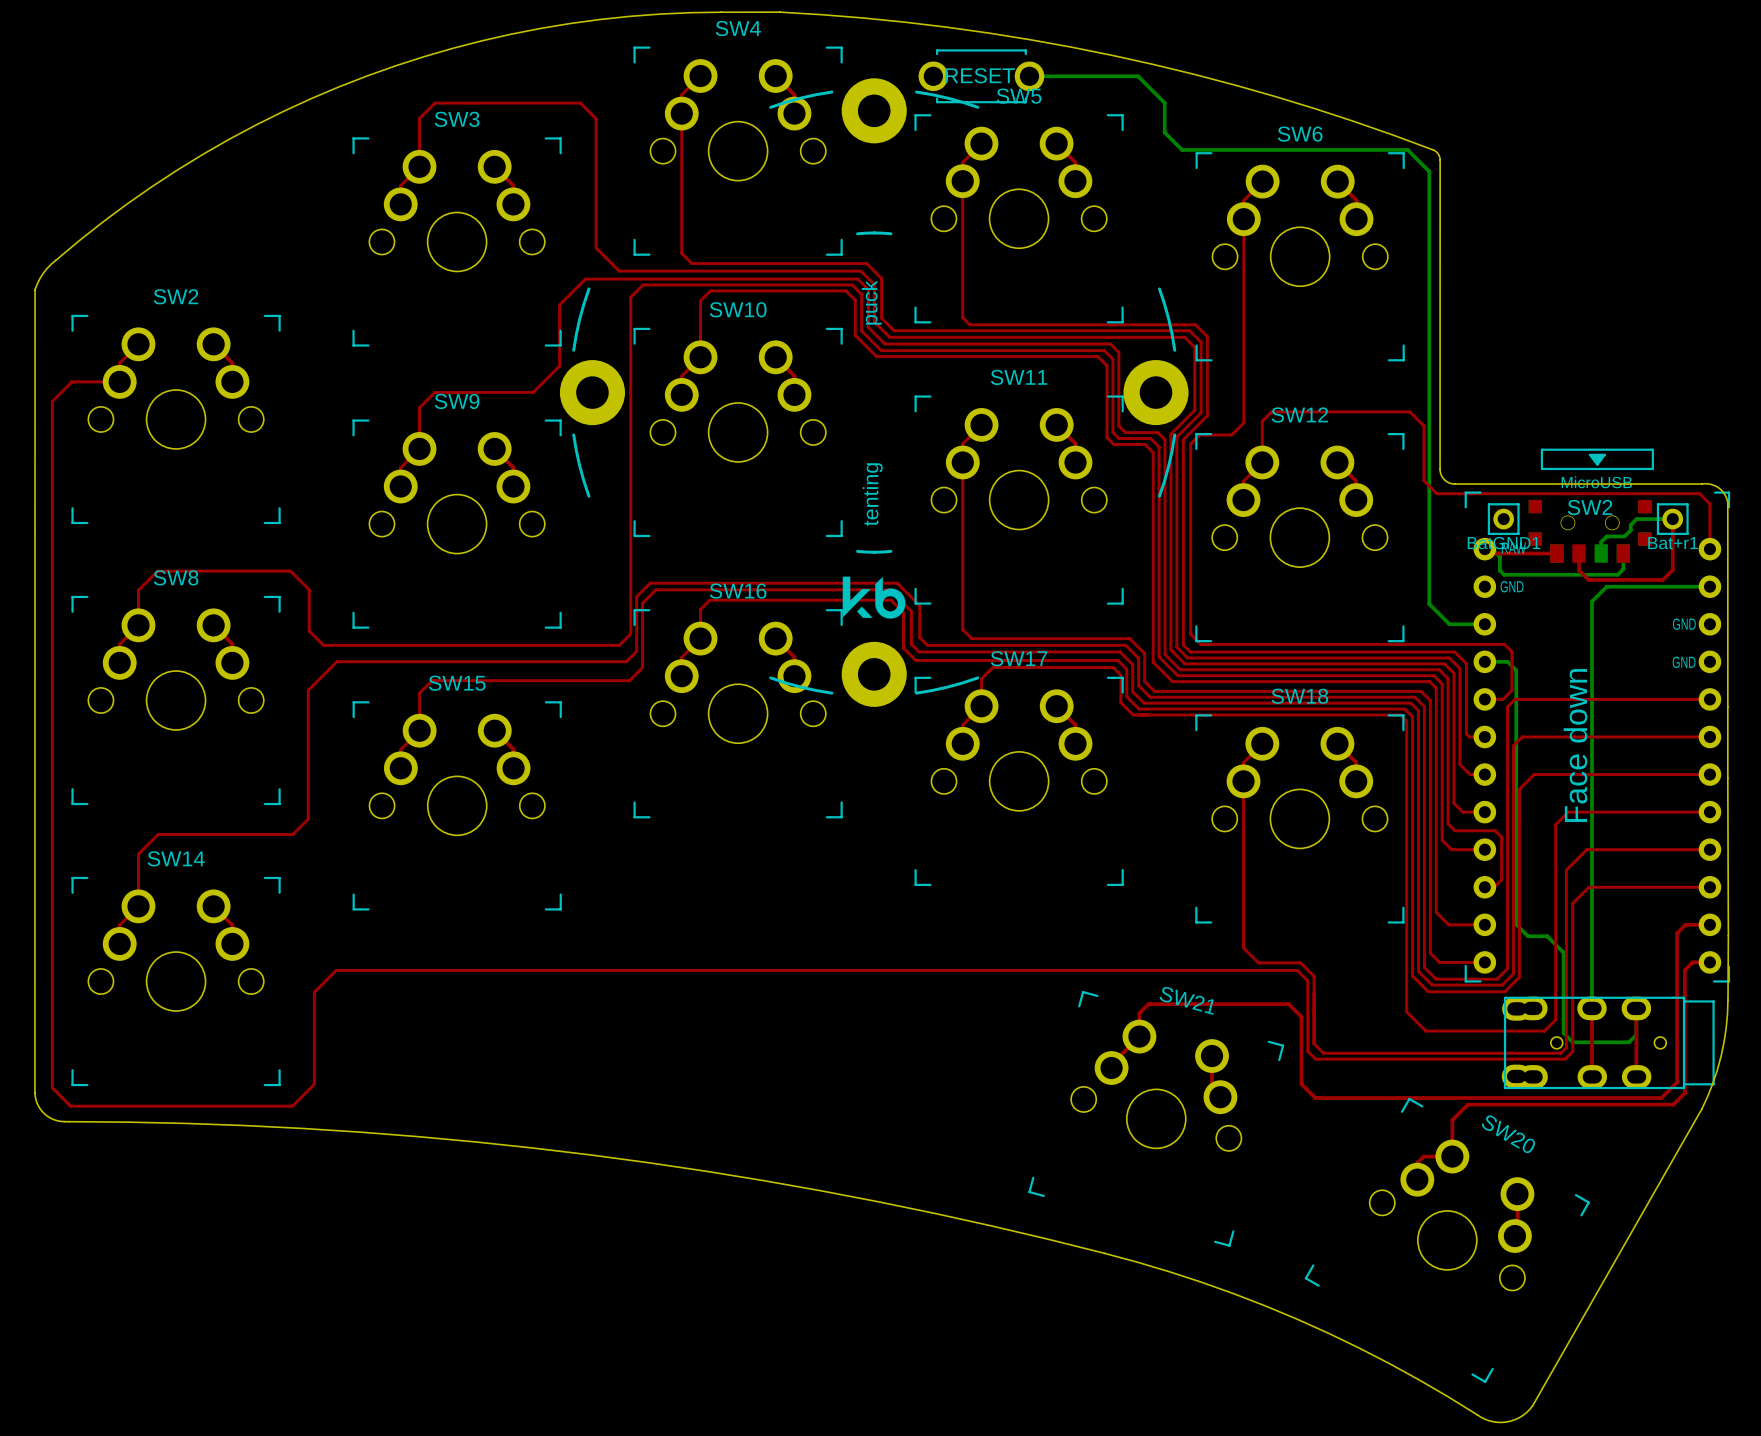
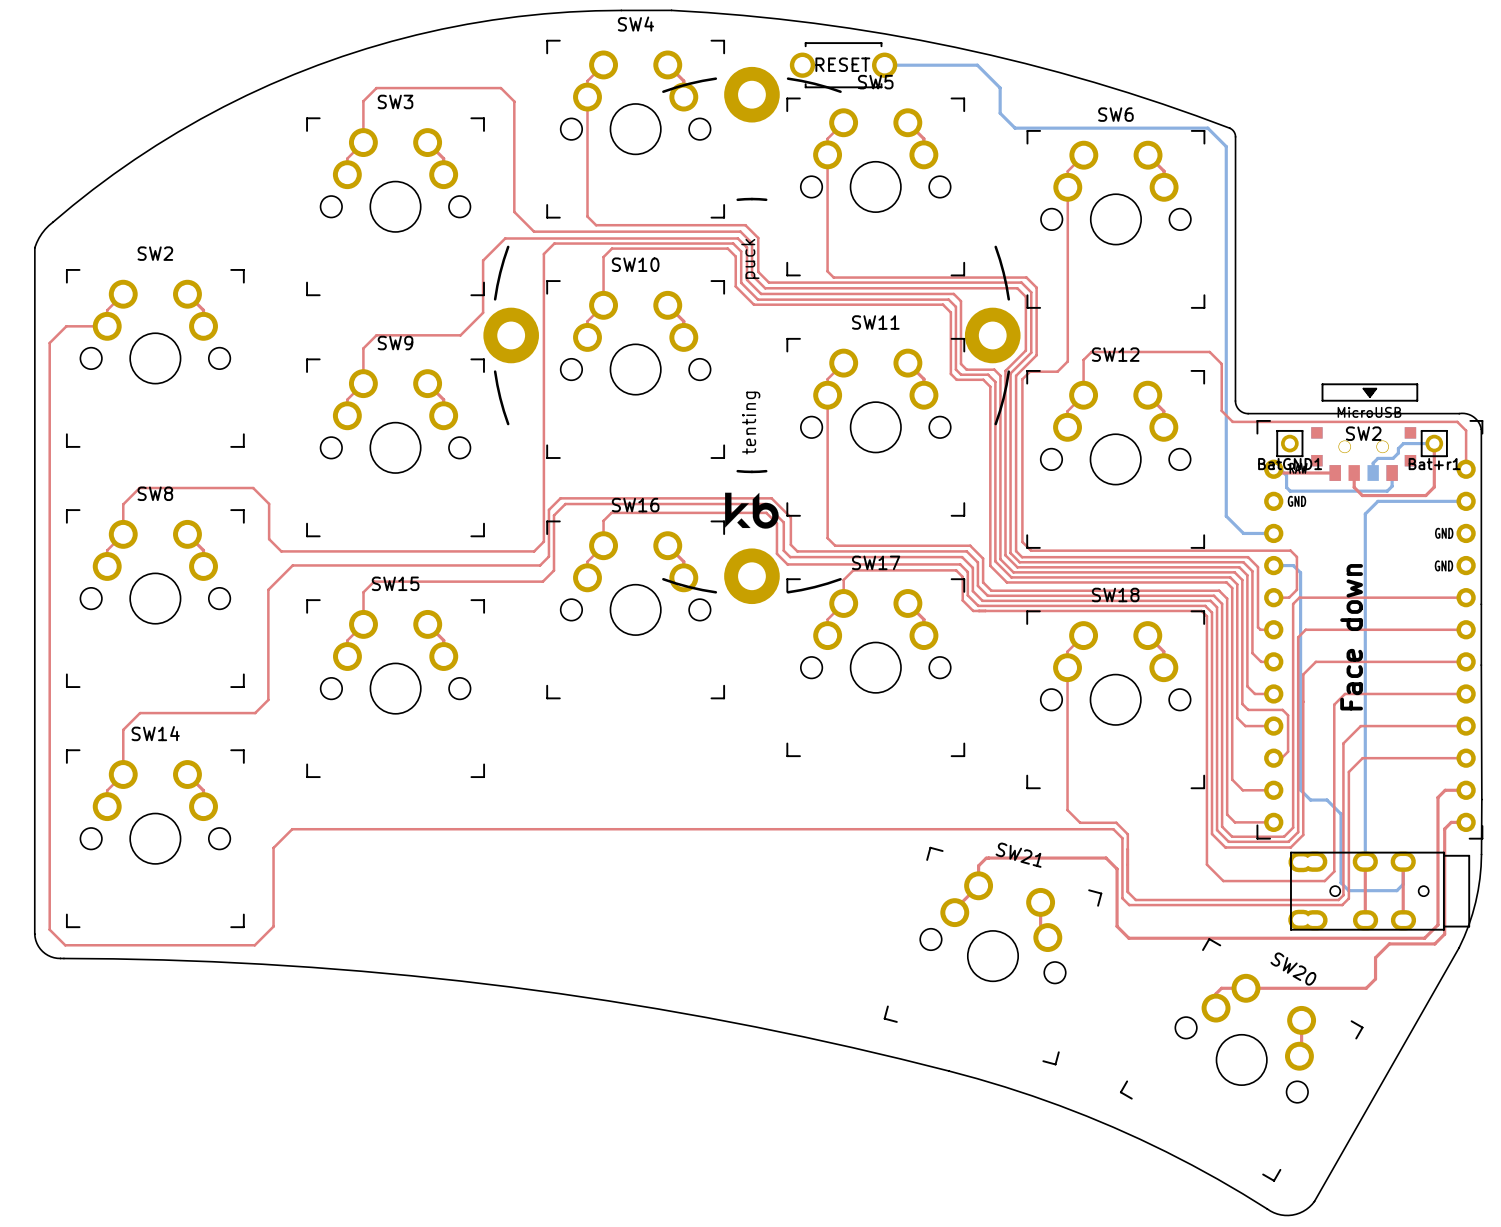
top track: (1620, 1104) (1467, 1104) (1452, 1120) (1452, 1156) -> (1389, 943) (1375, 957) (1375, 979) (1366, 988) (1245, 988)

